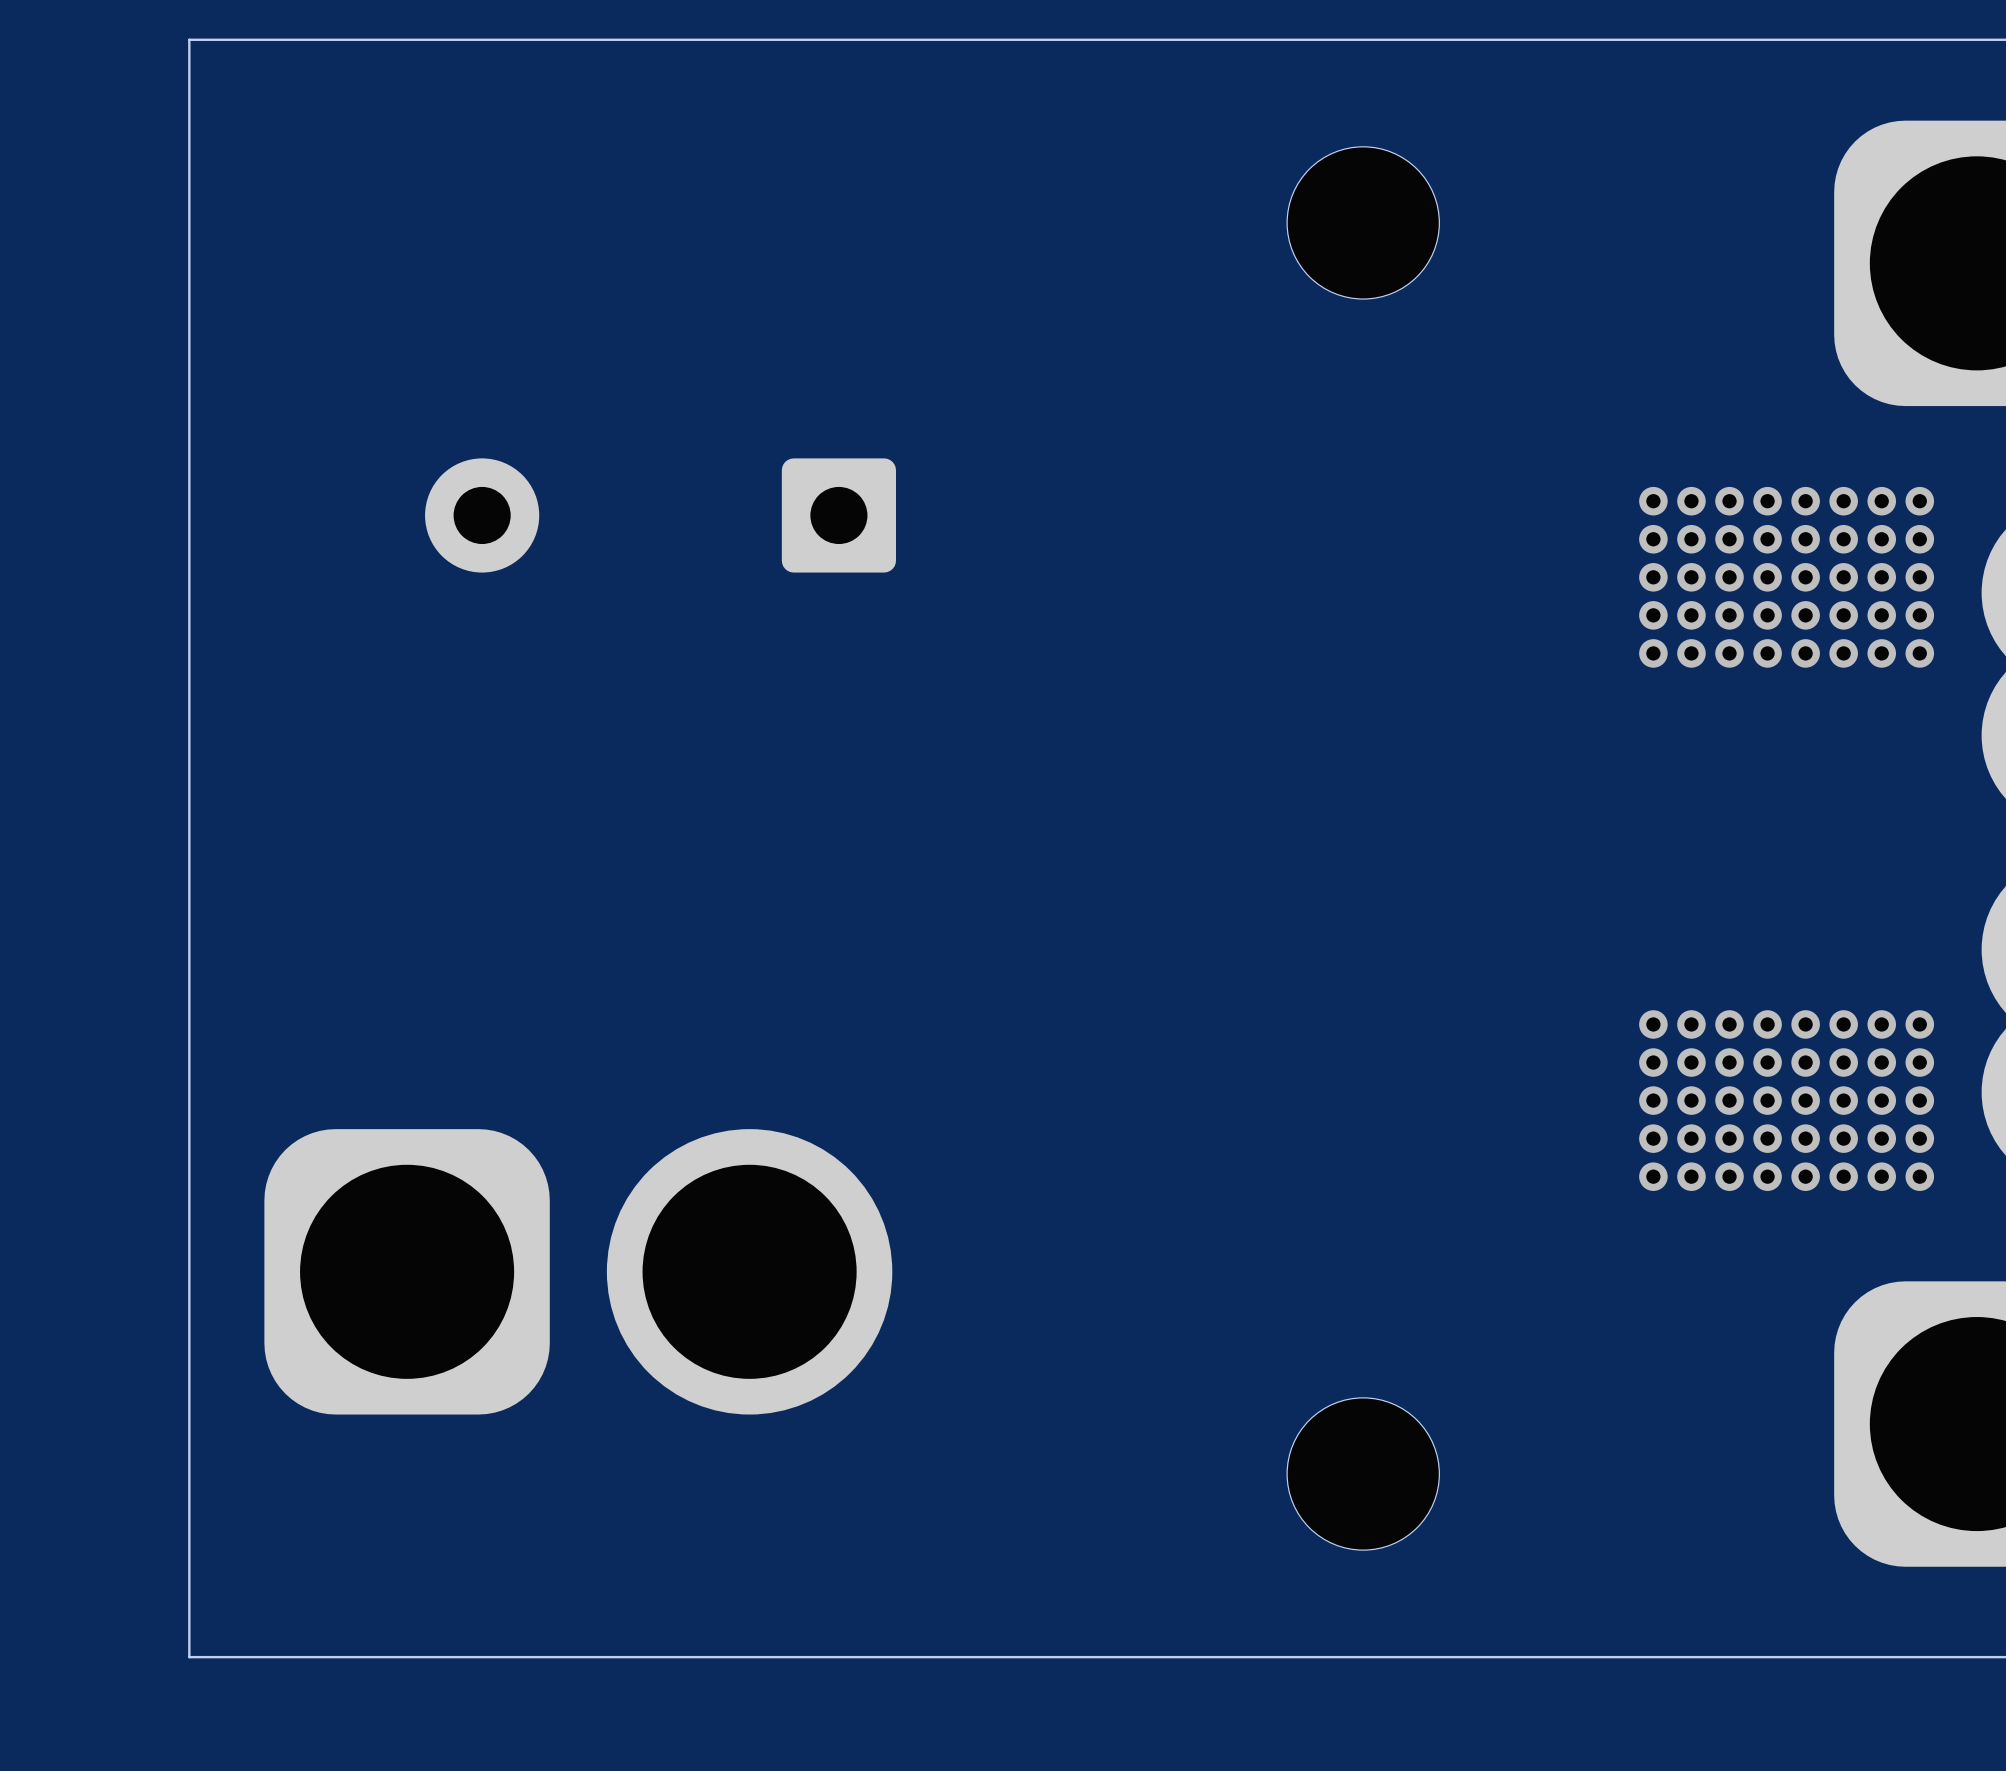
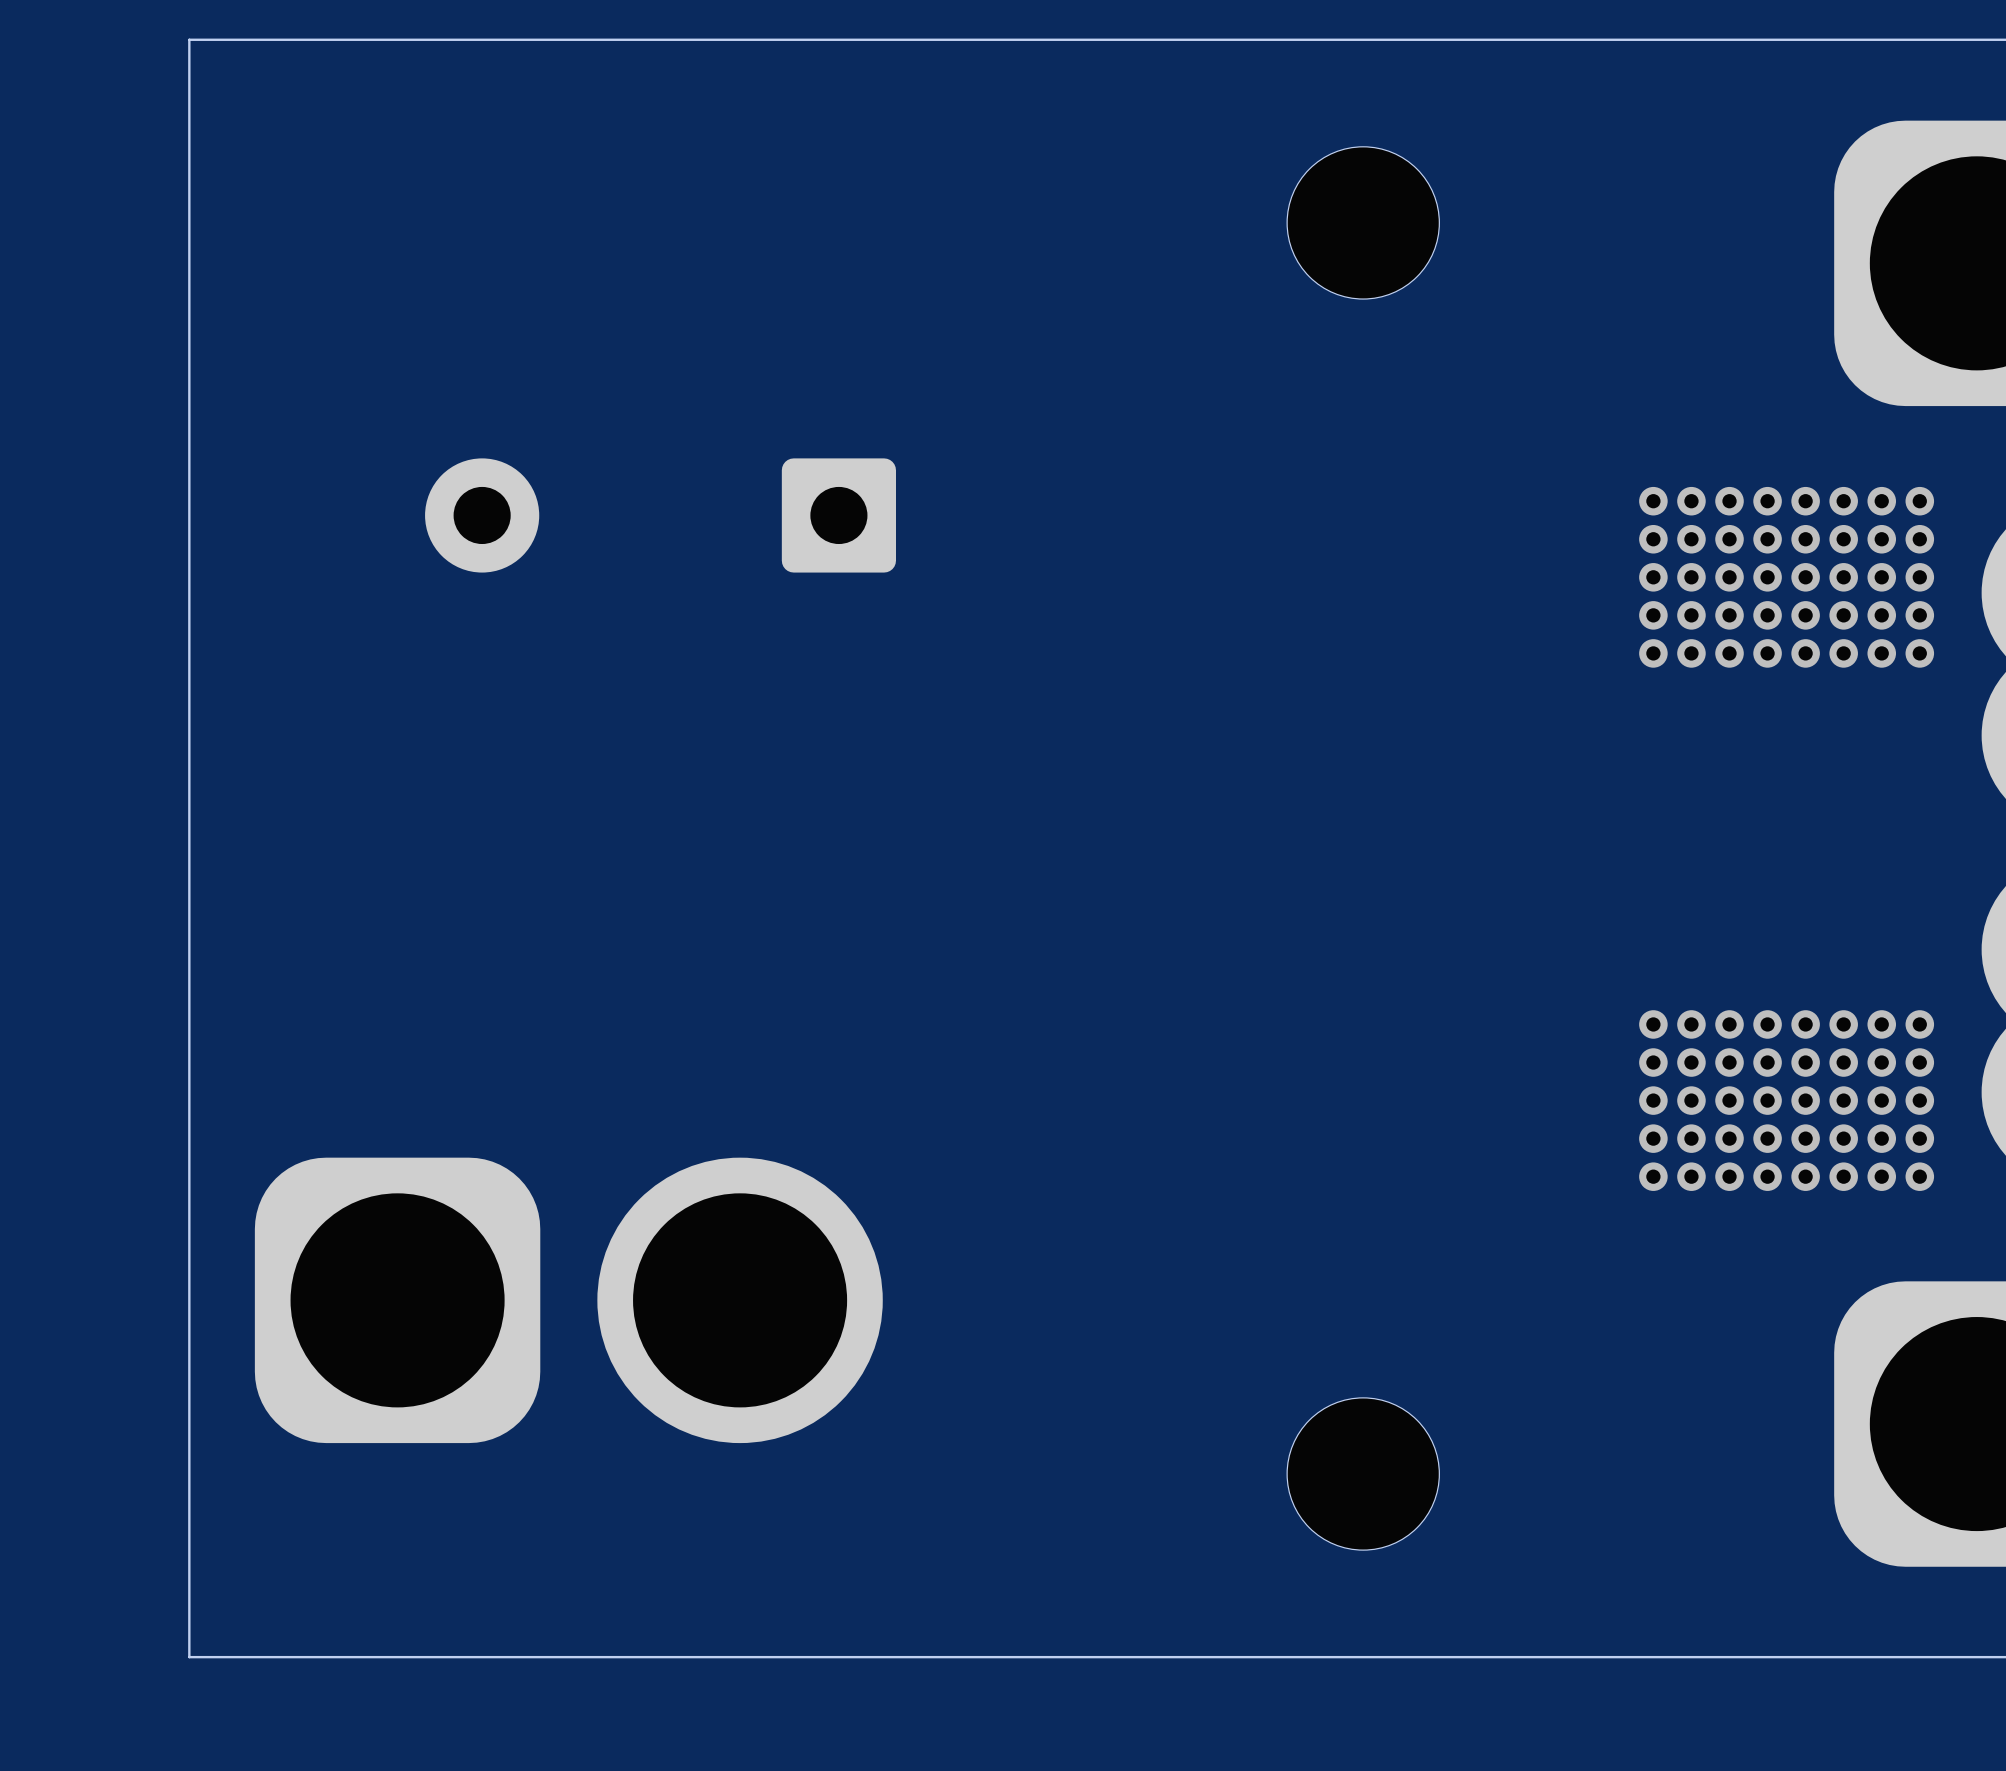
part position: (578, 1271) -> (568, 1300)

